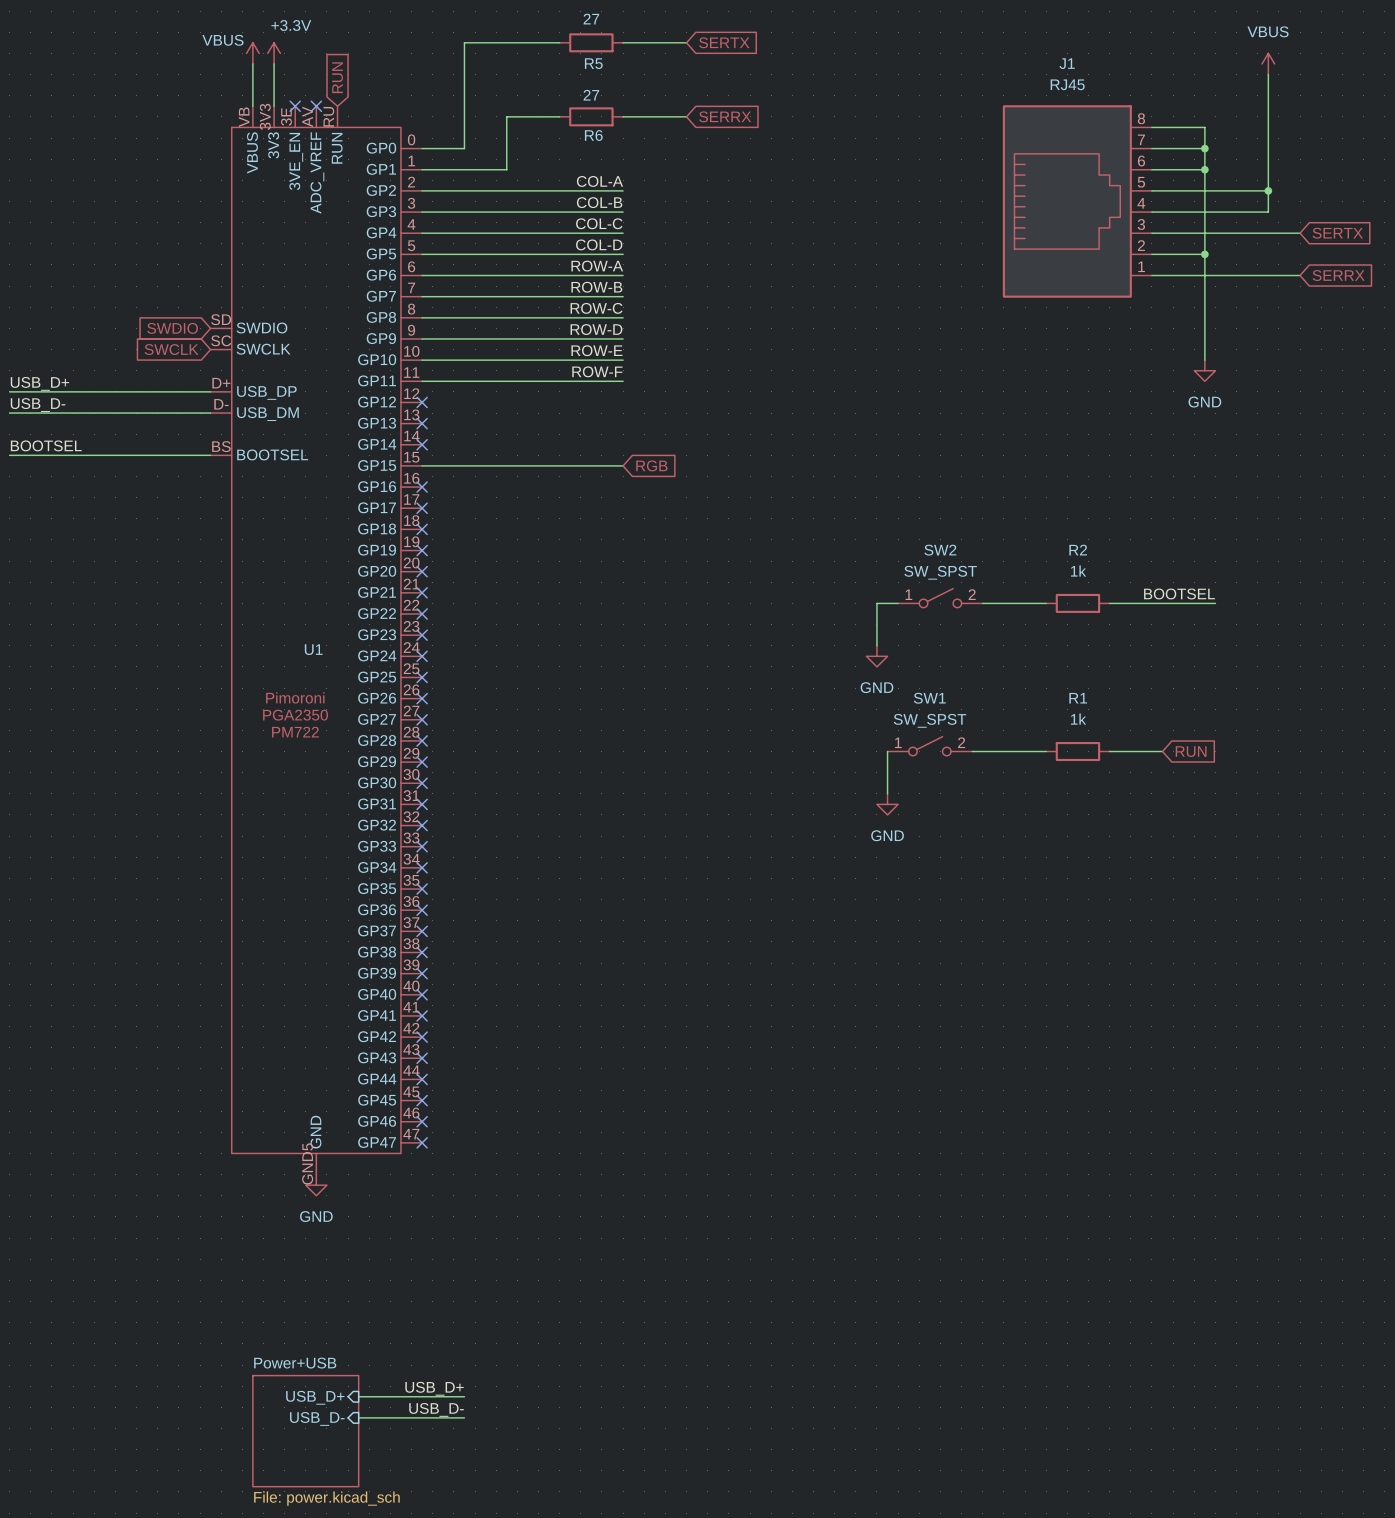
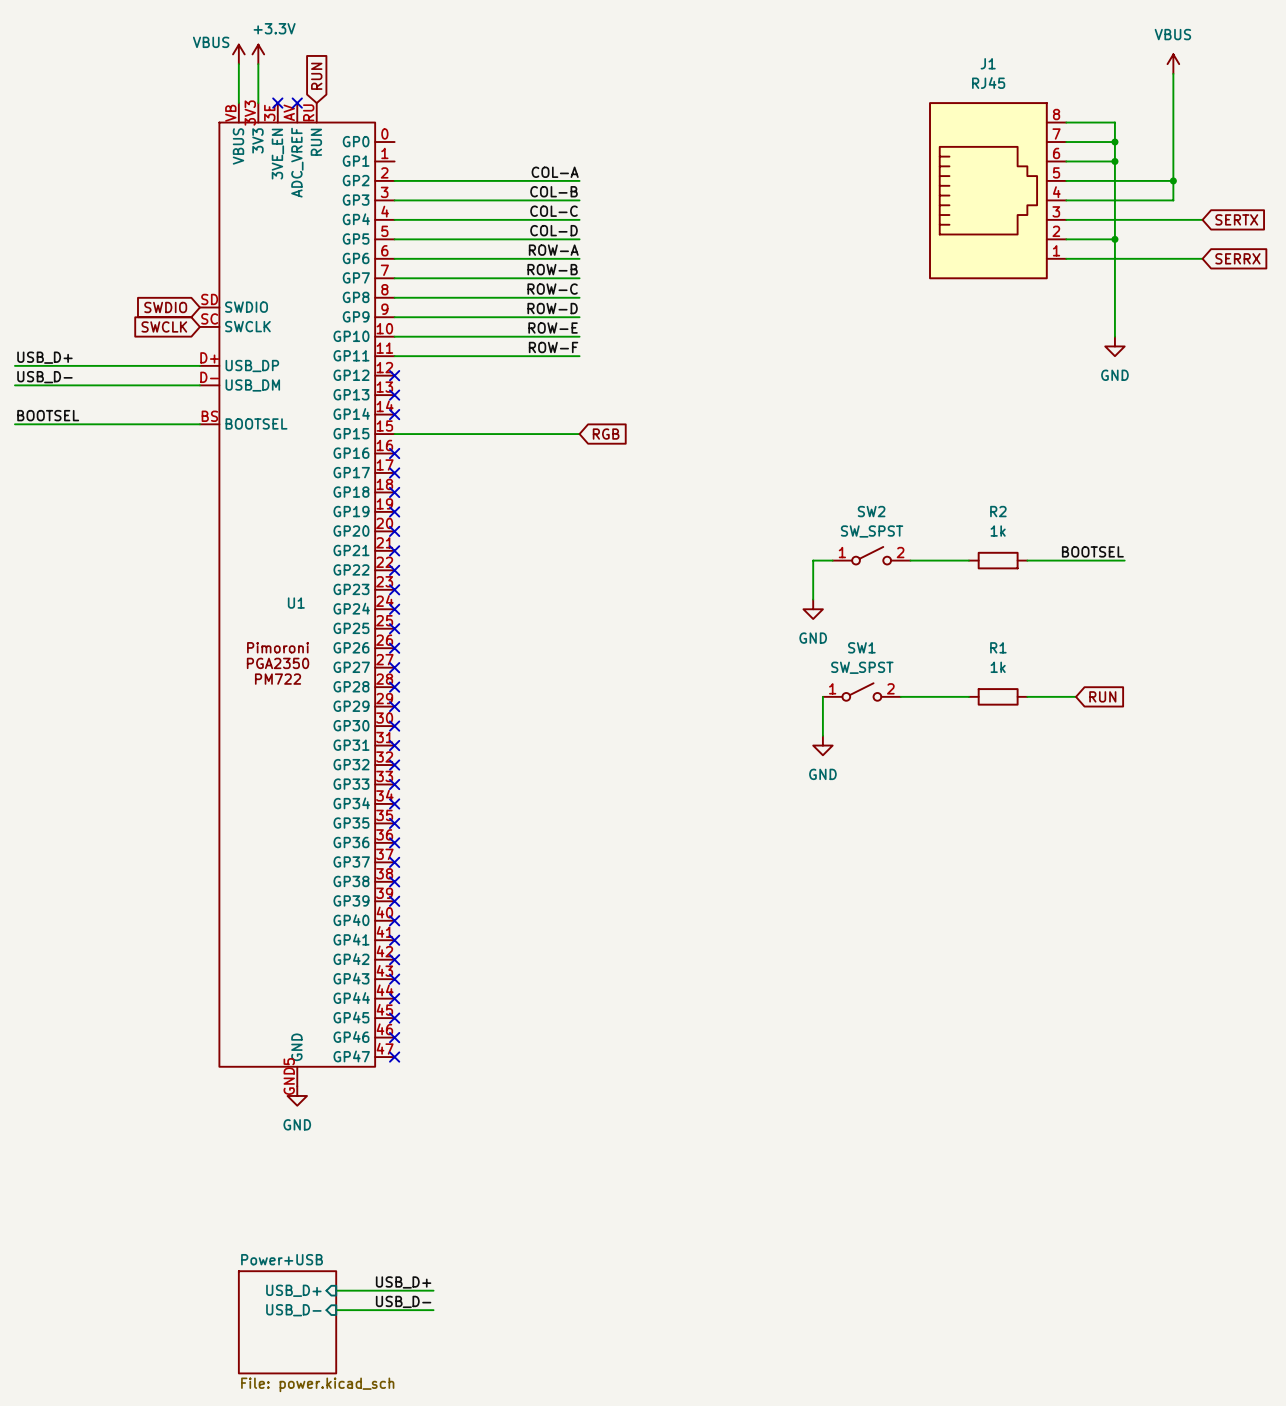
wire: (559, 42) (464, 42) (464, 148) (422, 148) -> none
R5: 27 (591, 42) -> none
wire: (623, 42) (686, 42) -> none
global label: SERTX (724, 42) -> none
wire: (559, 116) (506, 116) (506, 169) (422, 169) -> none
R6: 27 (591, 116) -> none
wire: (623, 116) (686, 116) -> none
global label: SERRX (725, 116) -> none

